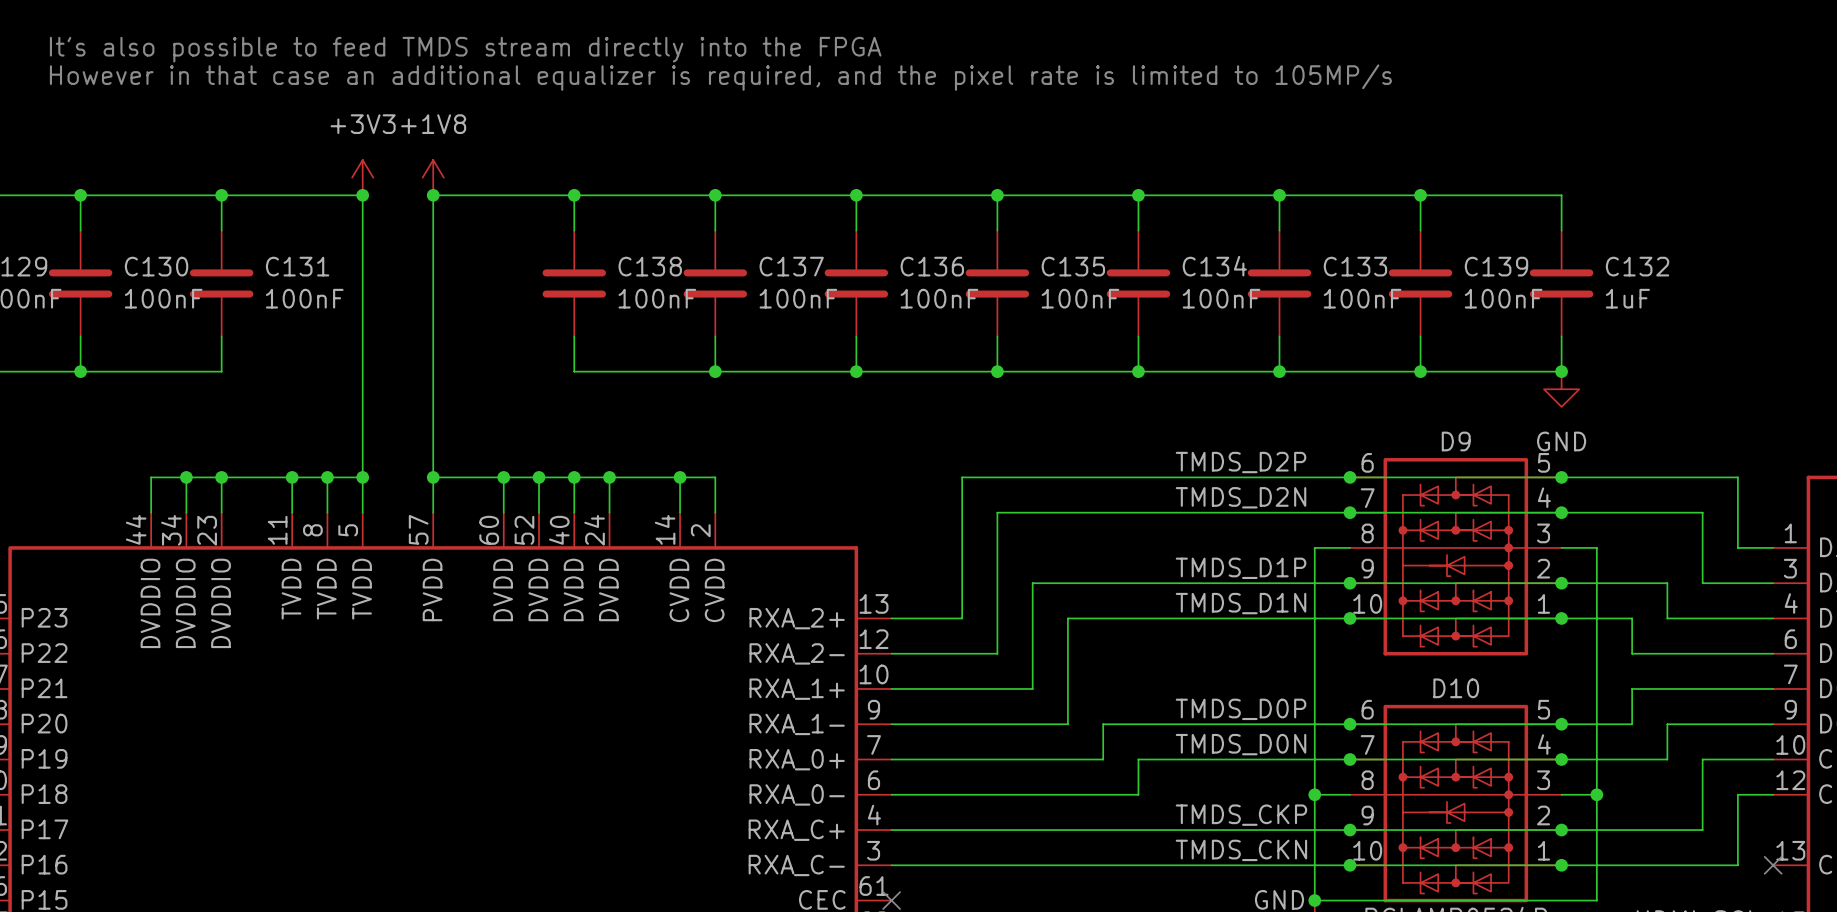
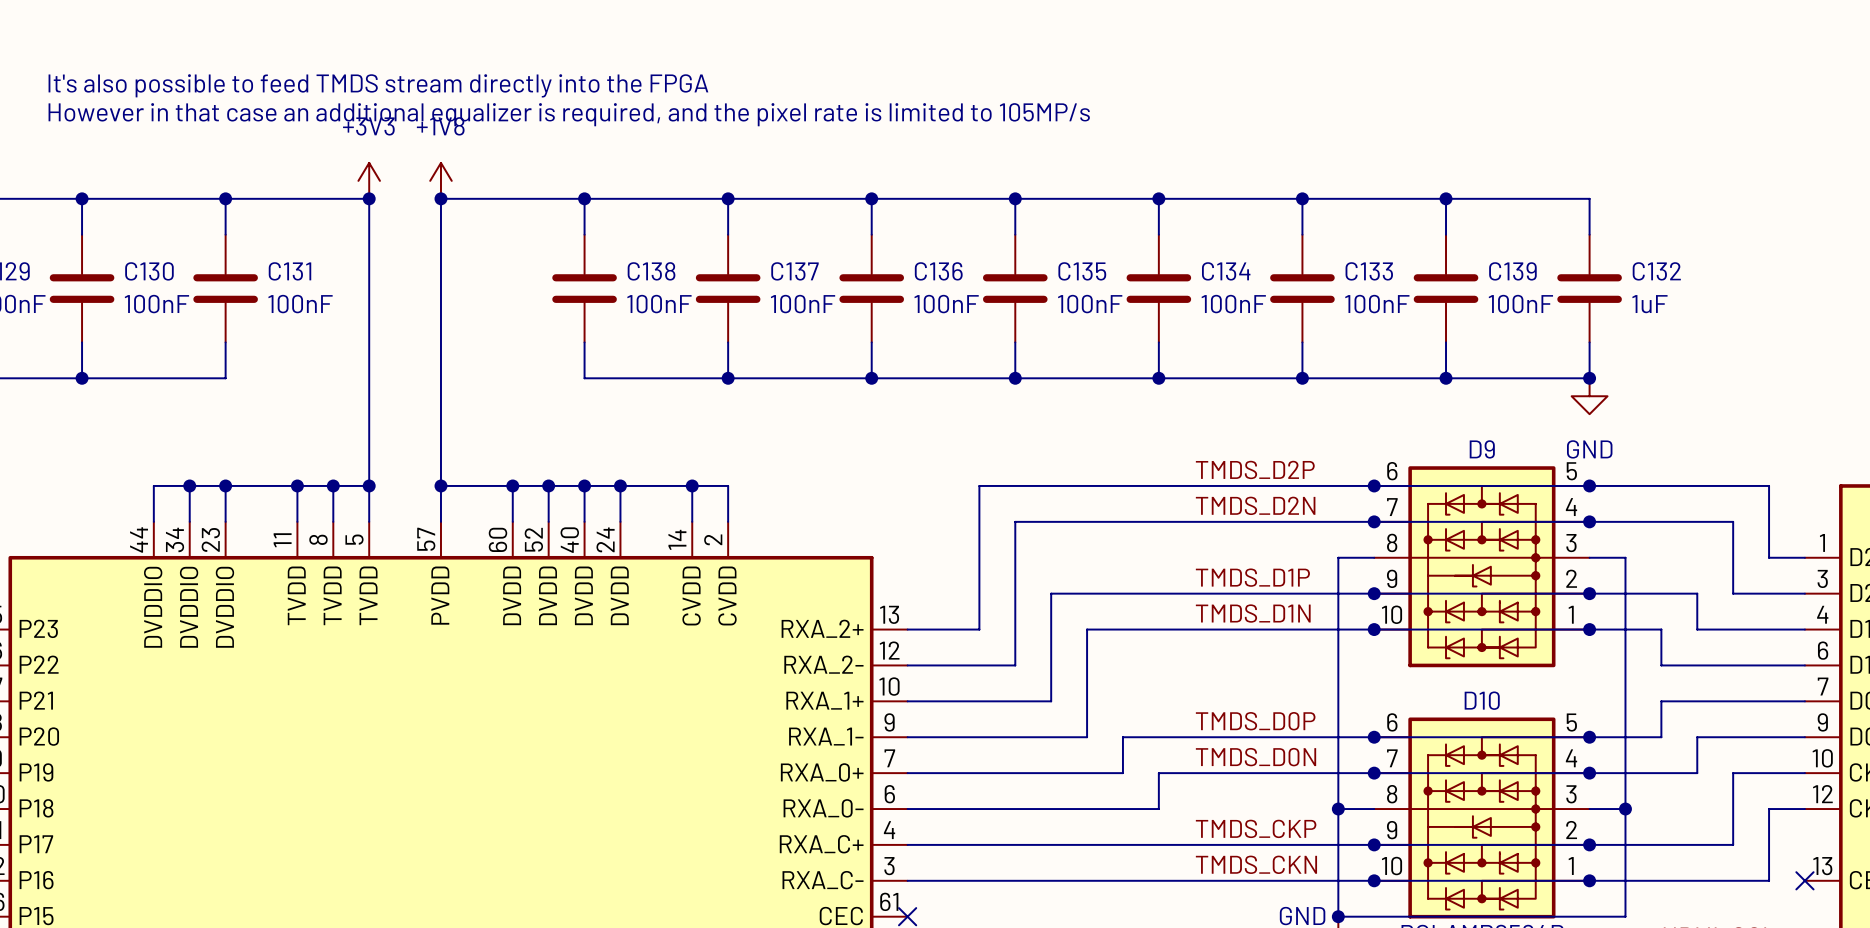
text position: It's also possible to feed TMDS stream directly into the FPGA (465, 49) -> It's also possible to feed TMDS stream directly into the FPGA (378, 85)
text position: However in that case an additional equalizer is required, and the pixel rate is limited to 105MP/s (720, 77) -> However in that case an additional equalizer is required, and the pixel rate is limited to 105MP/s (569, 114)

